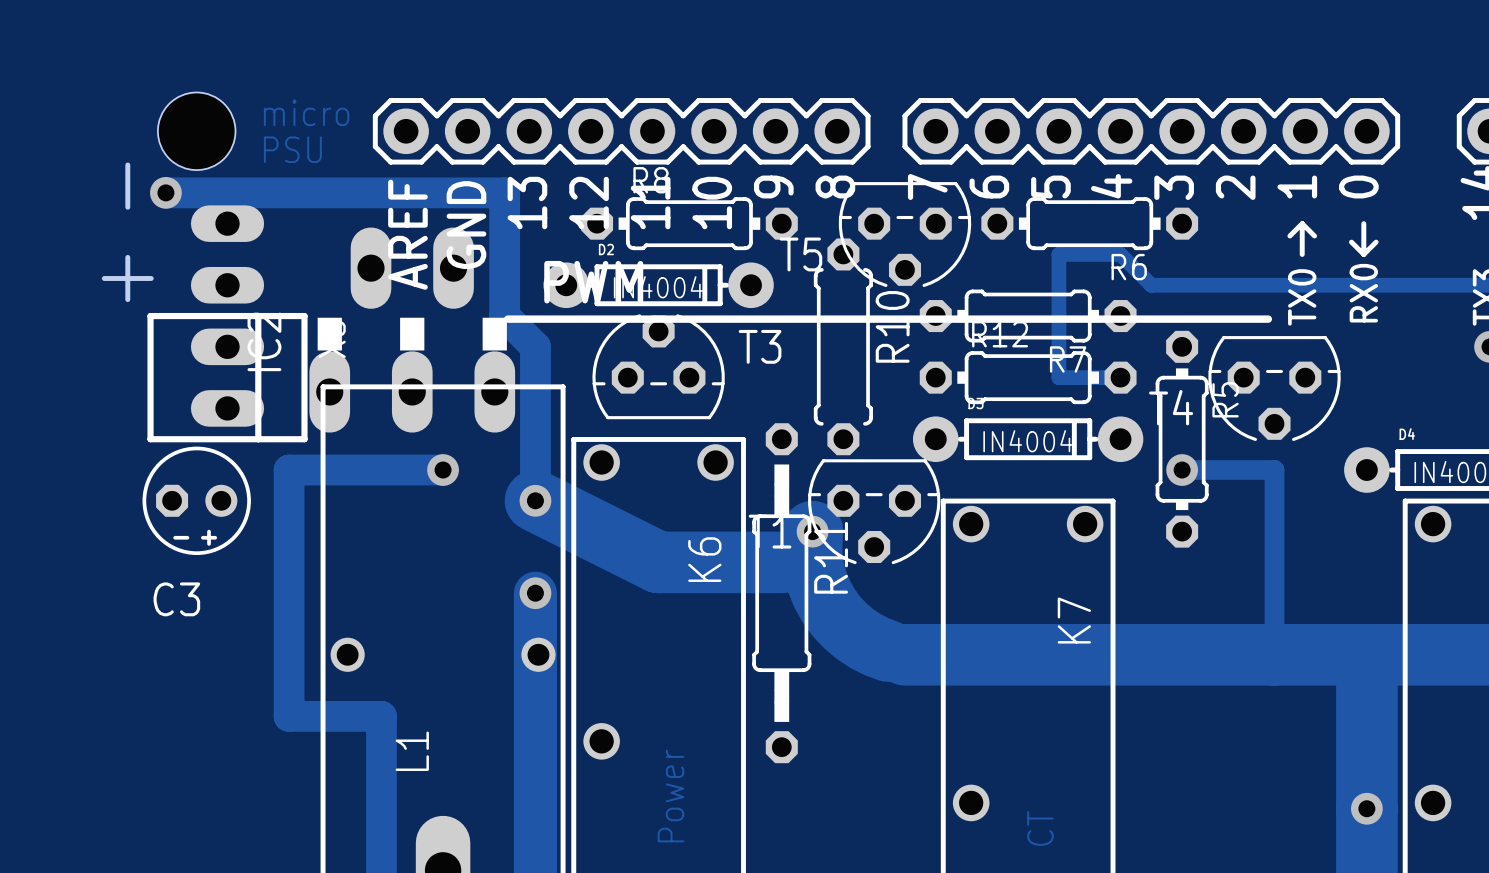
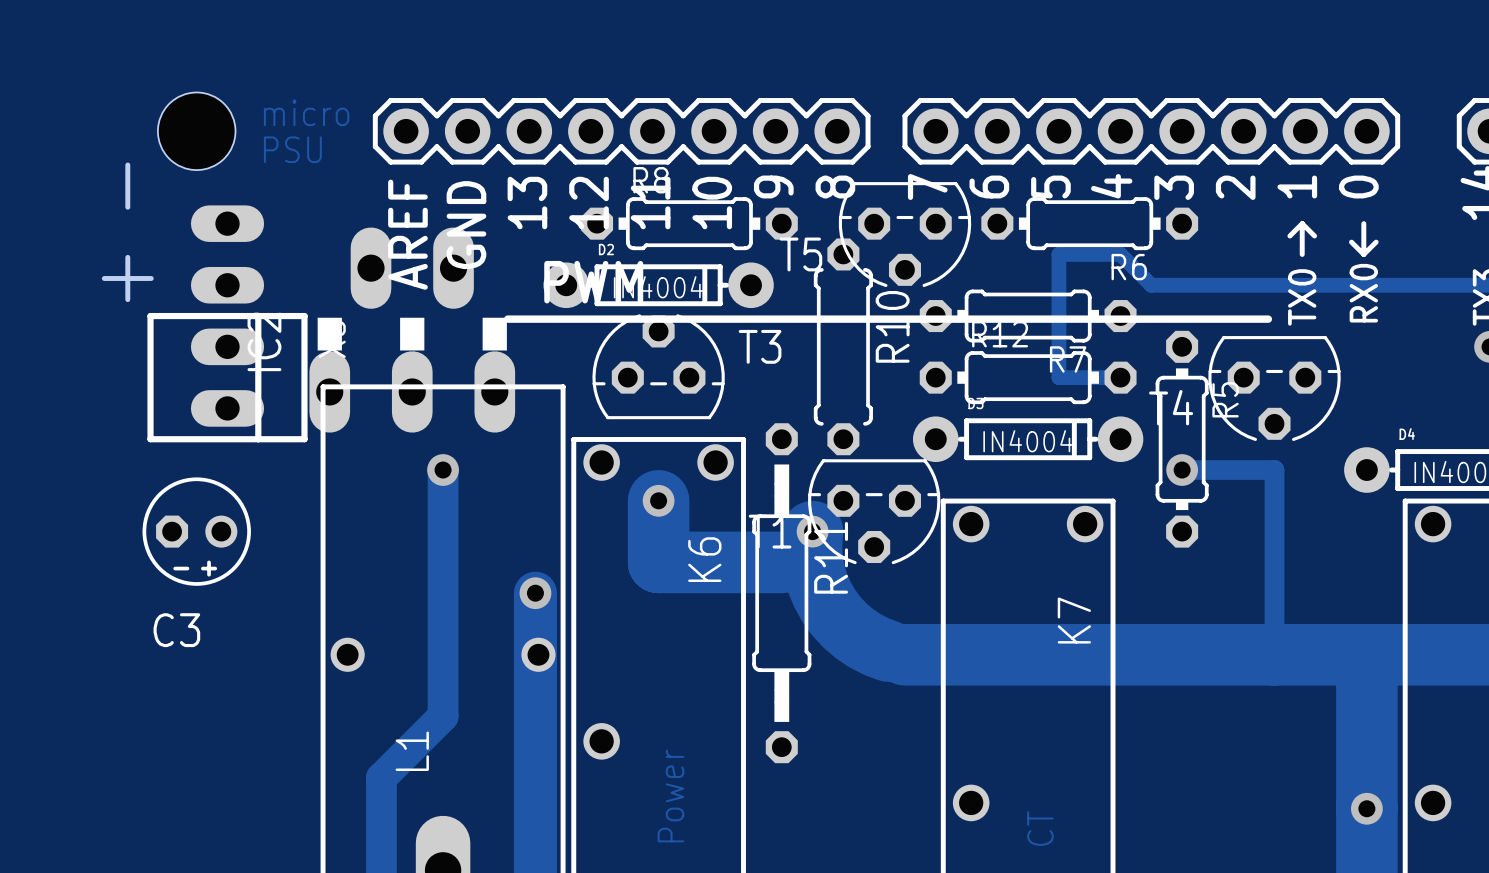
track: (165, 192) (504, 192) (504, 316) (535, 346) (535, 500) (658, 562) -> (658, 500) (658, 562)
via: (165, 192) -> none
track: (443, 470) (289, 470) (289, 716) (381, 716) (381, 777) -> (443, 470) (443, 716) (381, 777)
C3 position: (196, 500) -> (196, 531)
via position: (535, 500) -> (658, 500)

